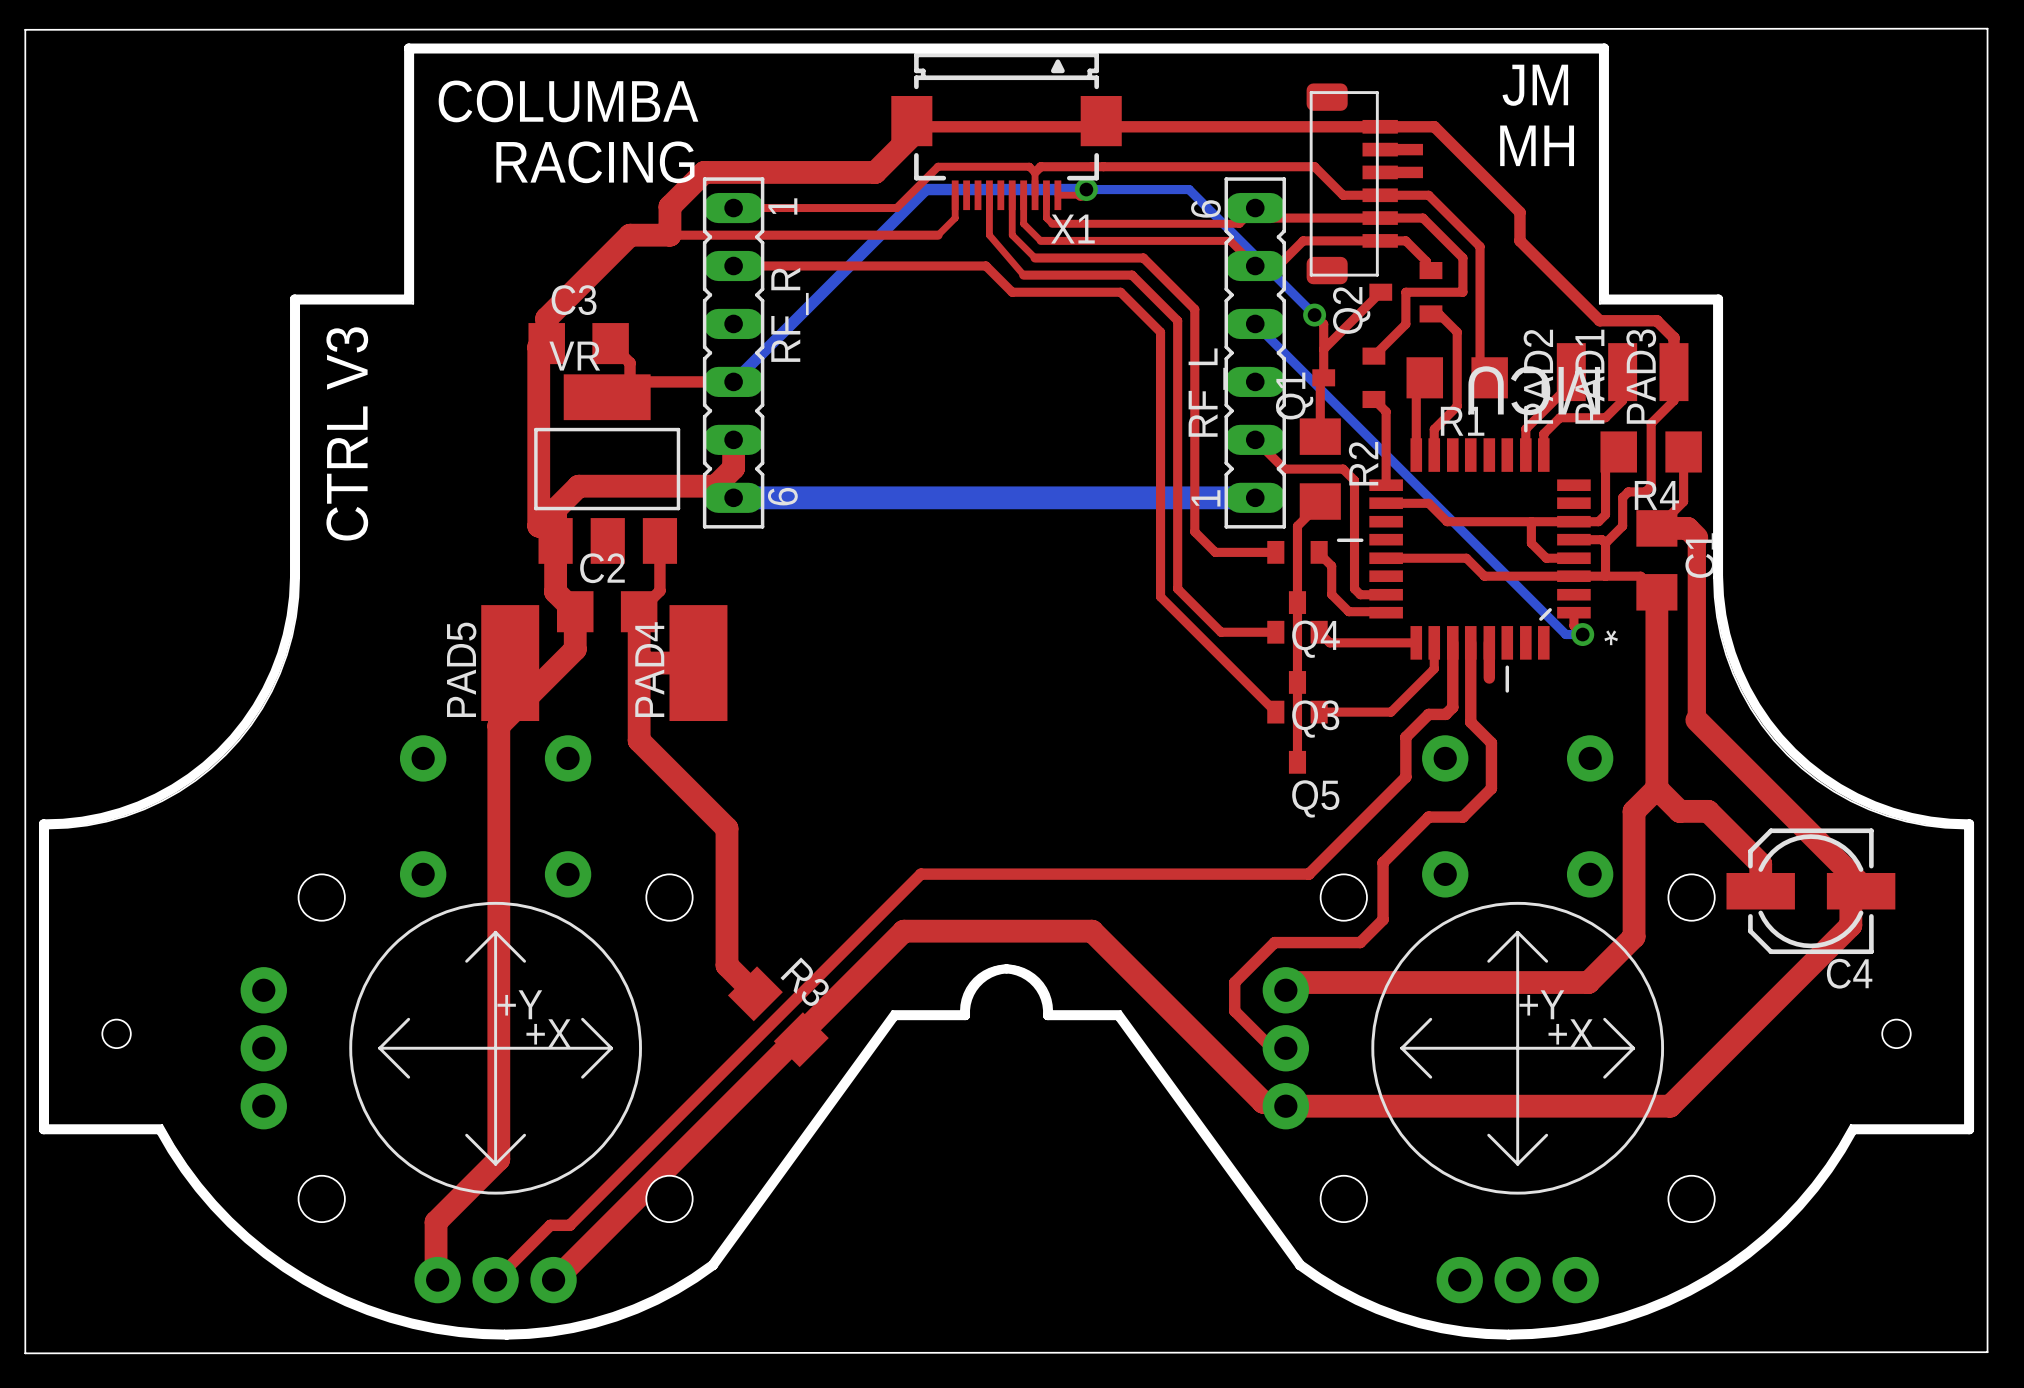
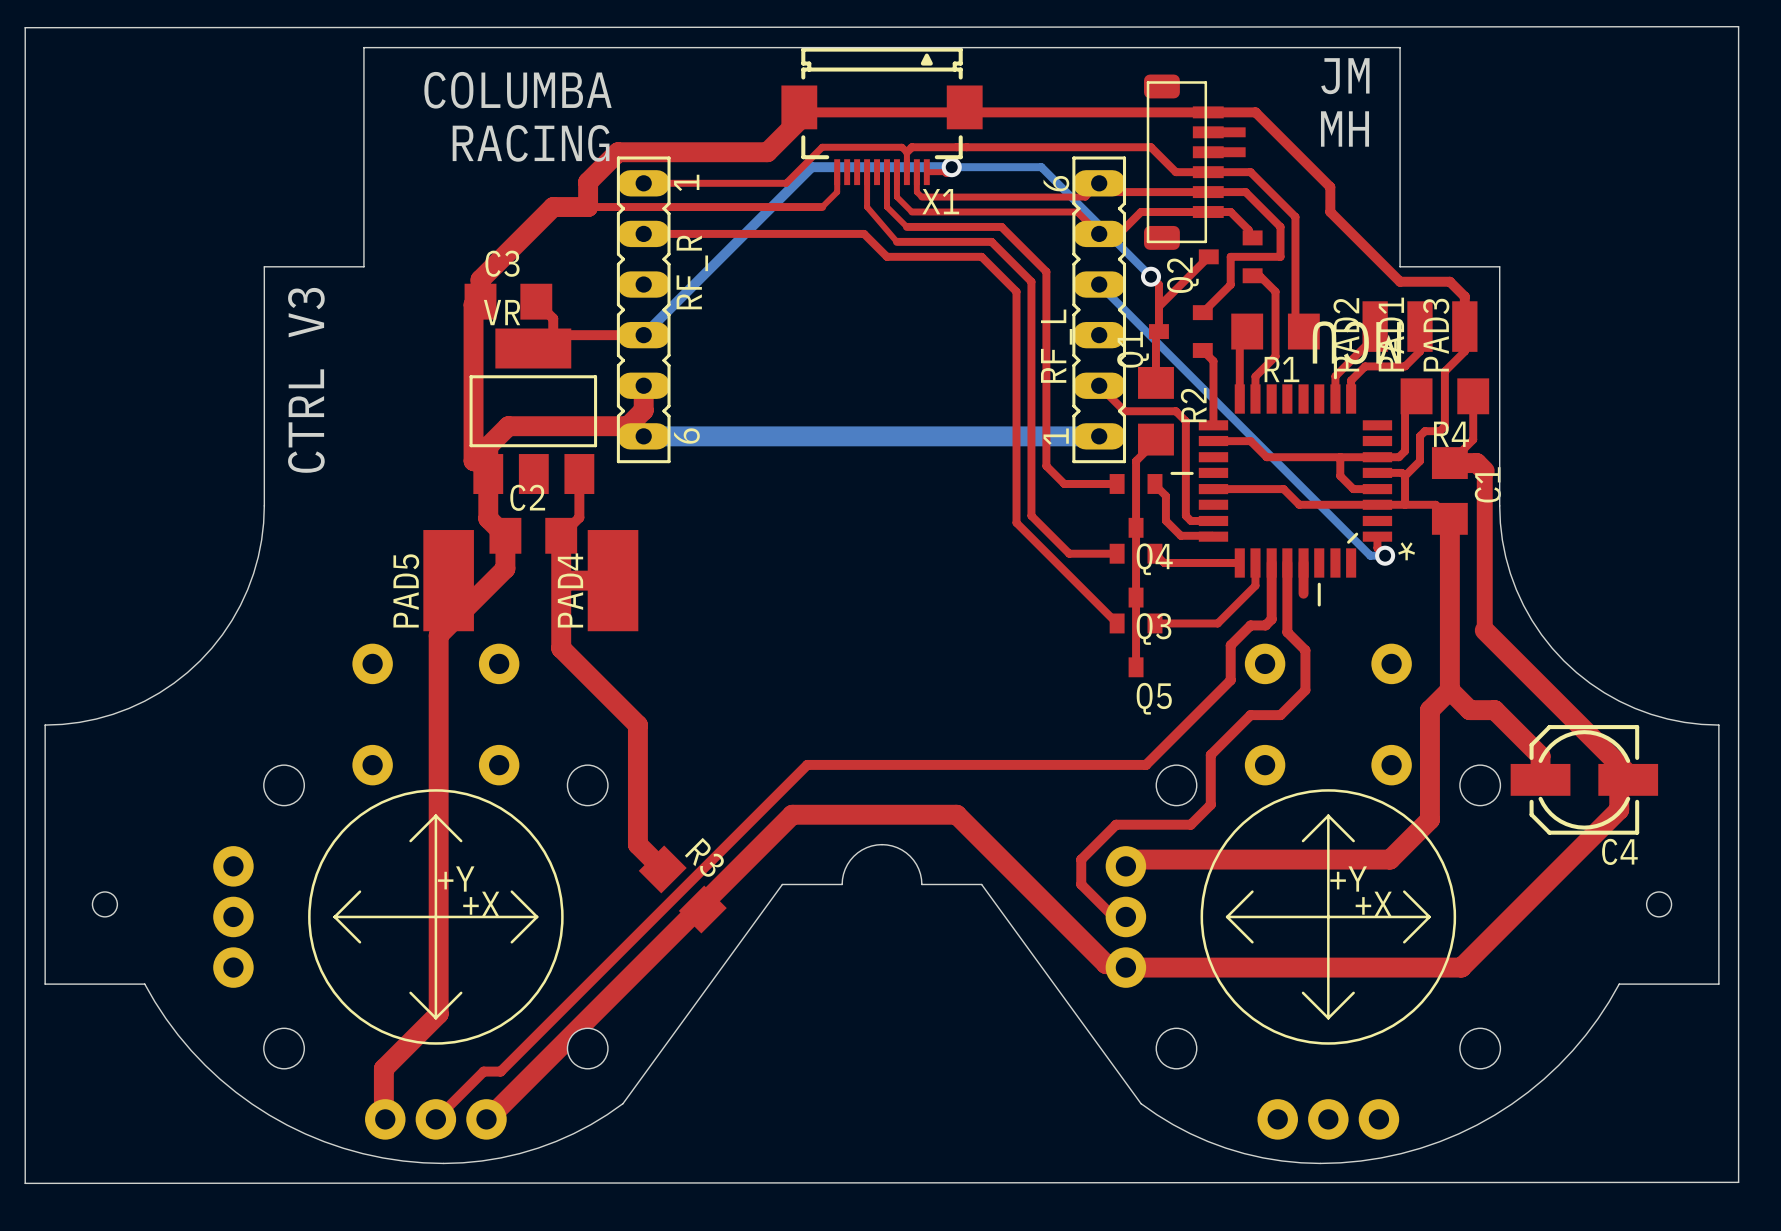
board edge: (408, 48) (1604, 48) (1604, 299) (1718, 299) (1719, 595) (1725, 634) (1738, 671) (1746, 689) (1767, 722) (1792, 752) (1822, 777) (1839, 788) (1856, 797) (1892, 812) (1930, 821) (1969, 823) (1969, 1129) (1853, 1129) (1828, 1169) (1799, 1206) (1747, 1253) (1709, 1280) (1667, 1301) (1601, 1324) (1555, 1332) (1508, 1335) (1463, 1332) (1398, 1317) (1337, 1289) (1299, 1265) (1118, 1015) (1047, 1015) (1045, 998) (1036, 983) (1028, 976) (1012, 969) (995, 971) (980, 979) (972, 988) (967, 998) (965, 1015) (894, 1015) (713, 1265) (676, 1289) (636, 1309) (594, 1323) (551, 1332) (506, 1335) (459, 1332) (413, 1324) (368, 1310) (304, 1280) (247, 1239) (198, 1188) (159, 1129) (43, 1129) (43, 823) (82, 821) (120, 812) (156, 797) (190, 777) (220, 752) (245, 723) (266, 690) (274, 672) (287, 635) (293, 596) (294, 299) (408, 299) (408, 48) -> none

